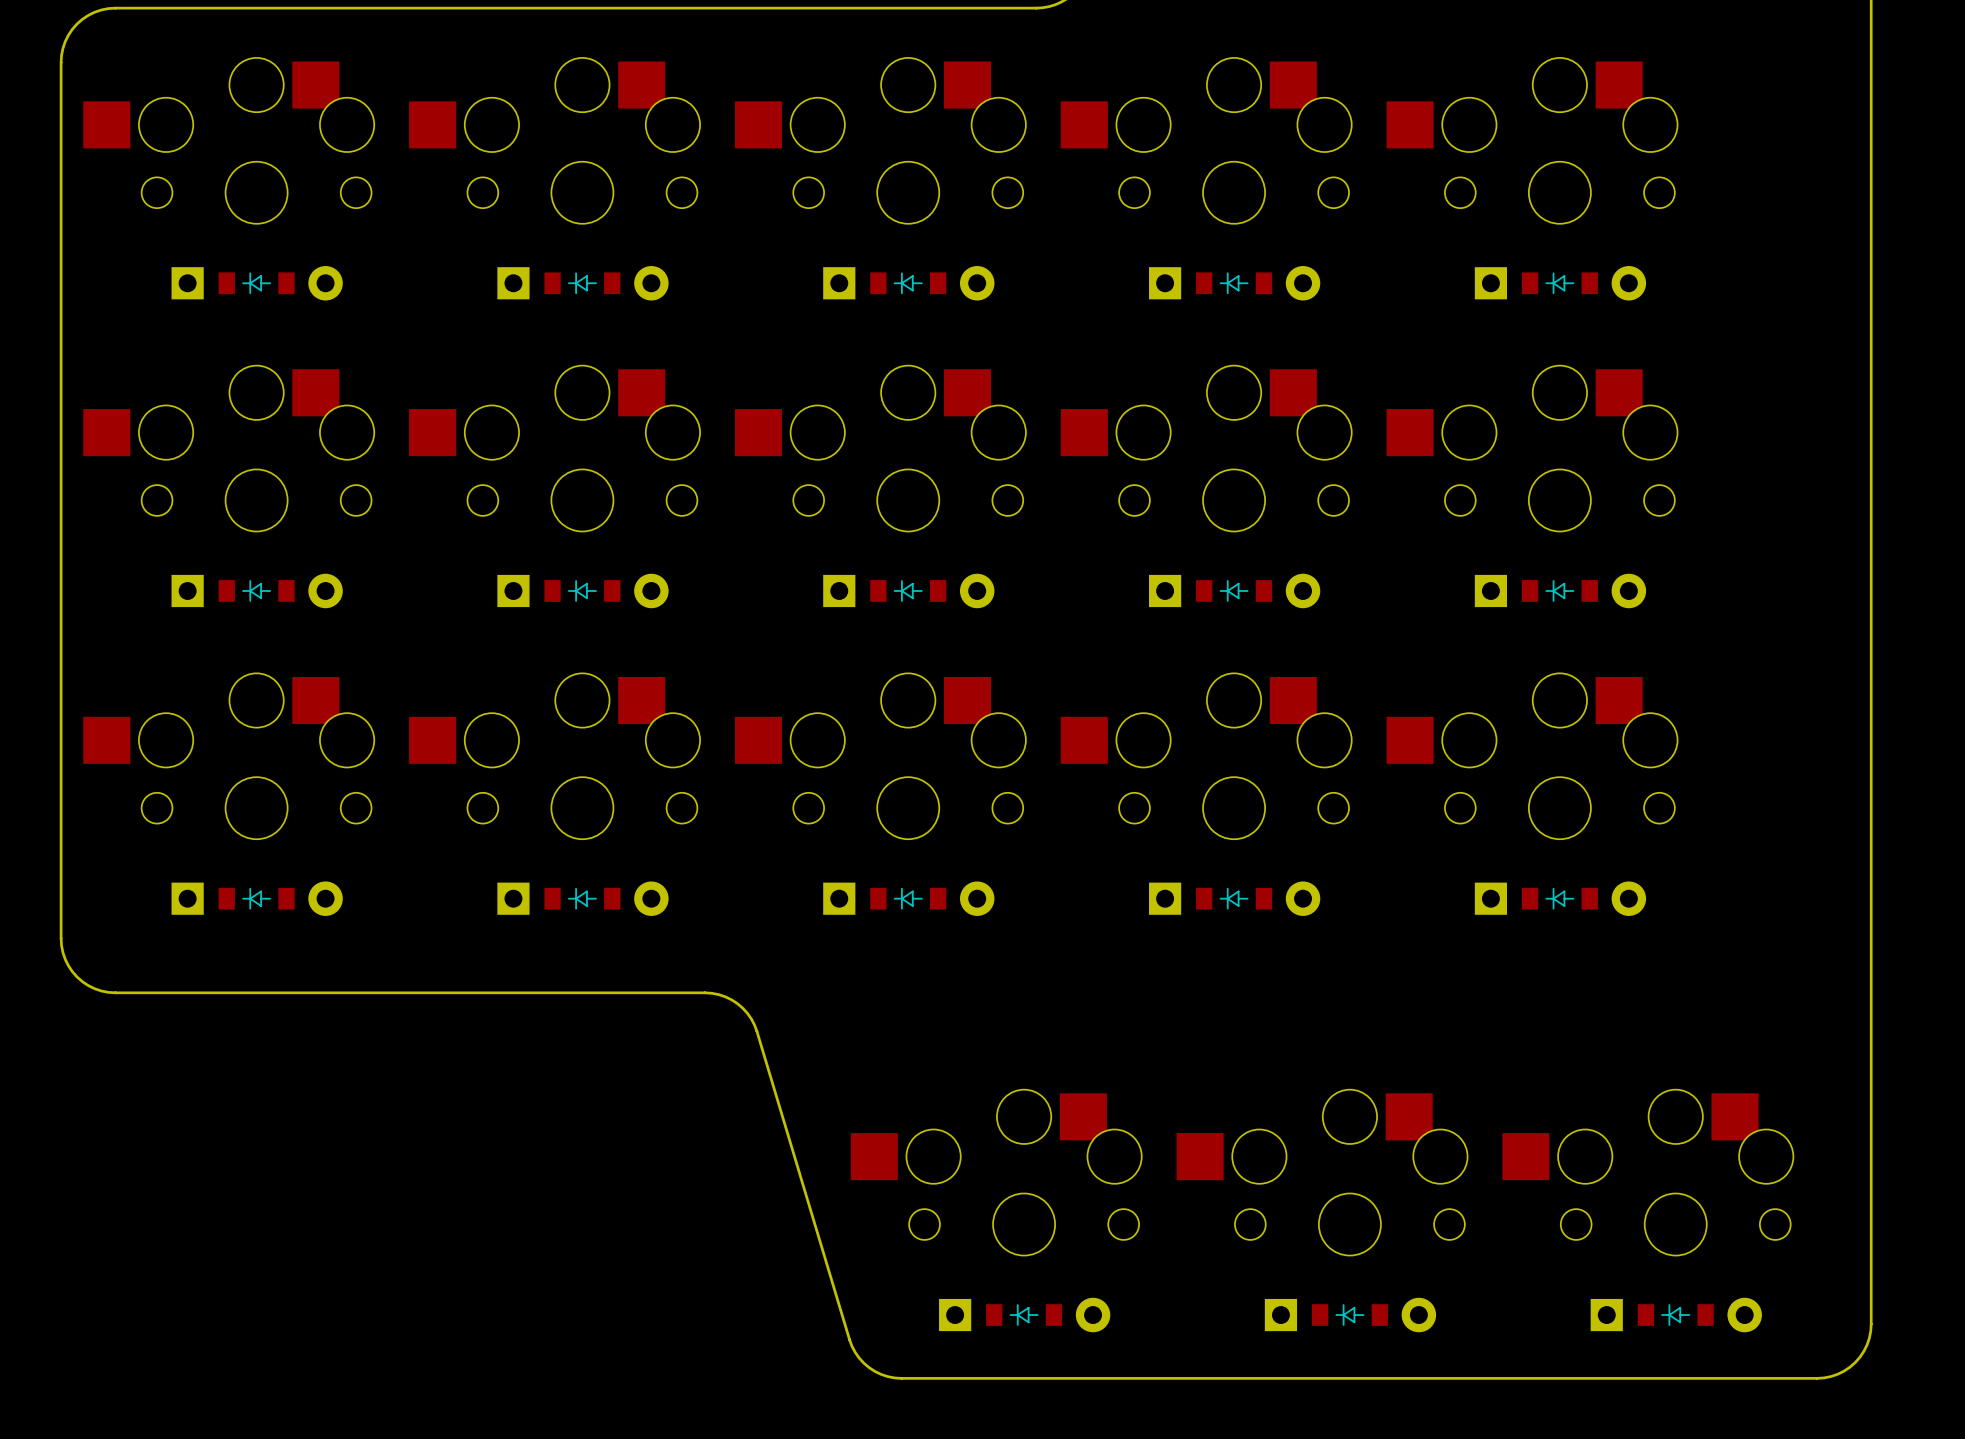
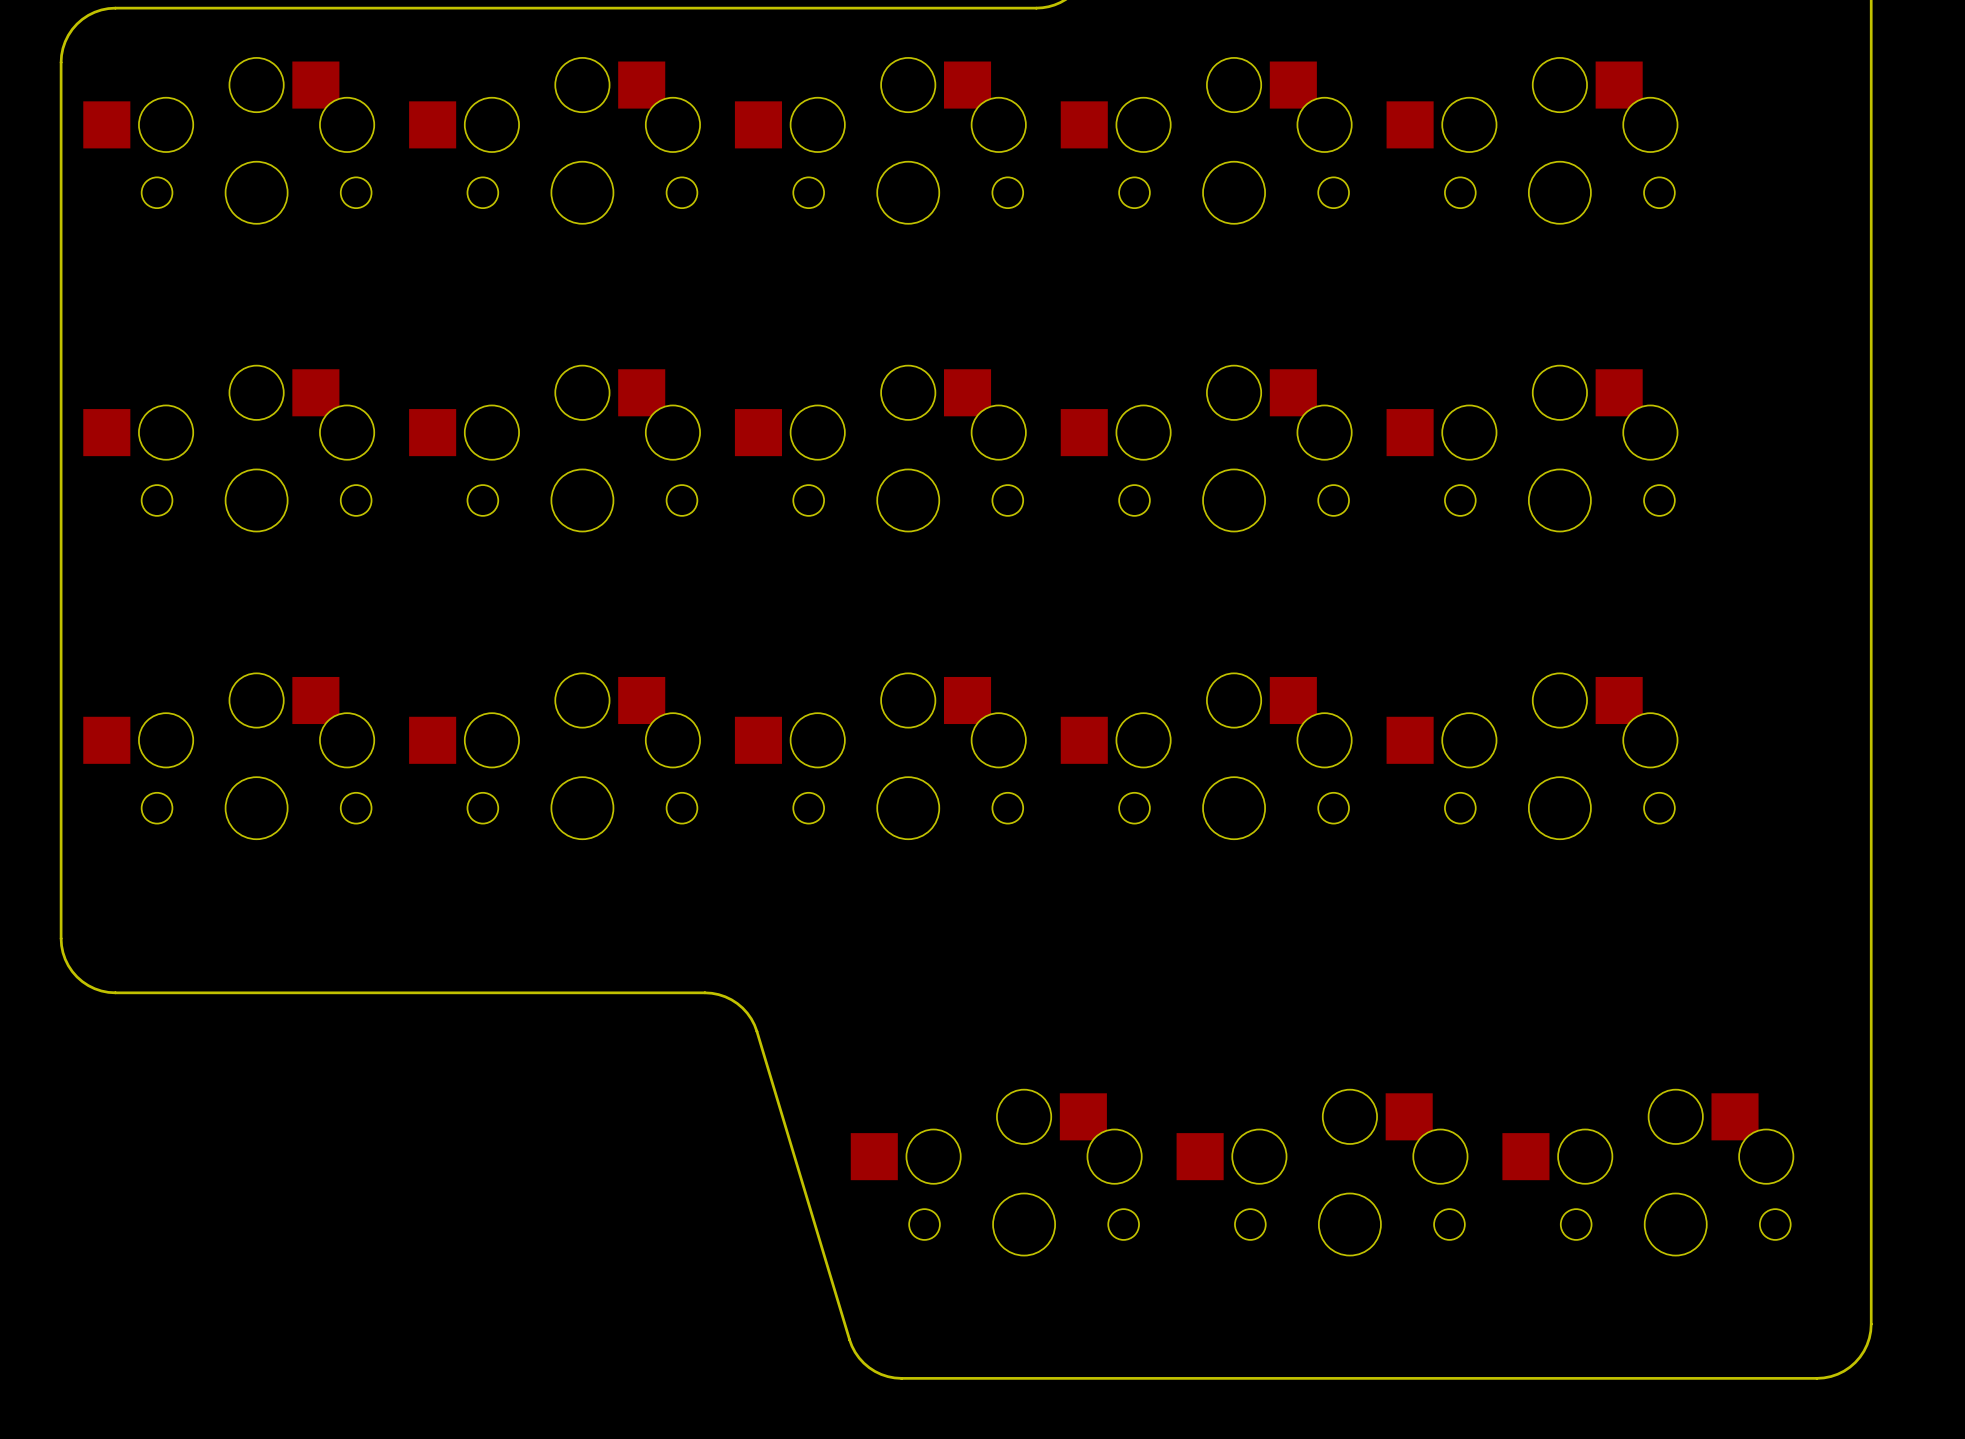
part: (257, 283) -> none
part: (582, 283) -> none
part: (908, 283) -> none
part: (1234, 283) -> none
part: (1560, 283) -> none
part: (257, 590) -> none
part: (582, 590) -> none
part: (908, 590) -> none
part: (1234, 590) -> none
part: (1560, 590) -> none
part: (257, 898) -> none
part: (582, 898) -> none
part: (908, 898) -> none
part: (1234, 898) -> none
part: (1560, 898) -> none
part: (1024, 1315) -> none
part: (1350, 1315) -> none
part: (1676, 1315) -> none

